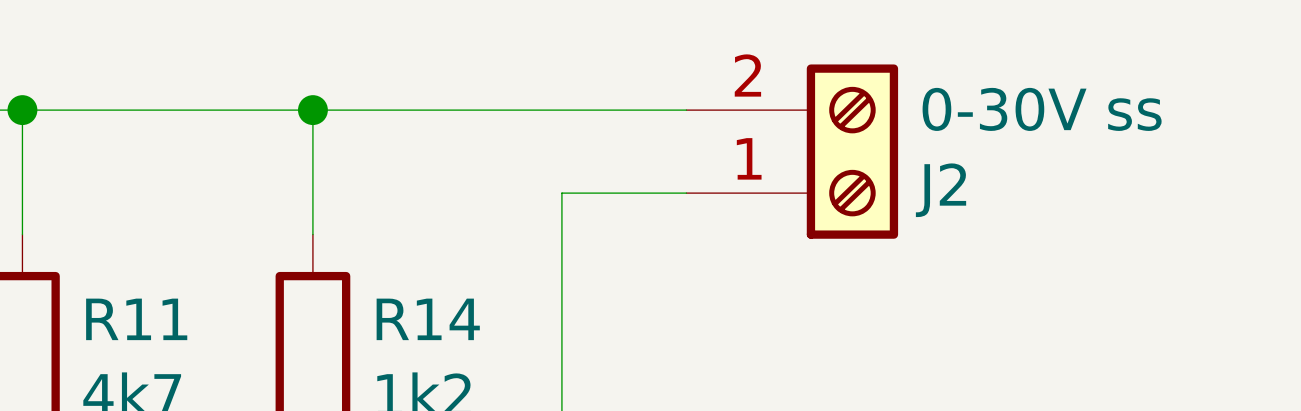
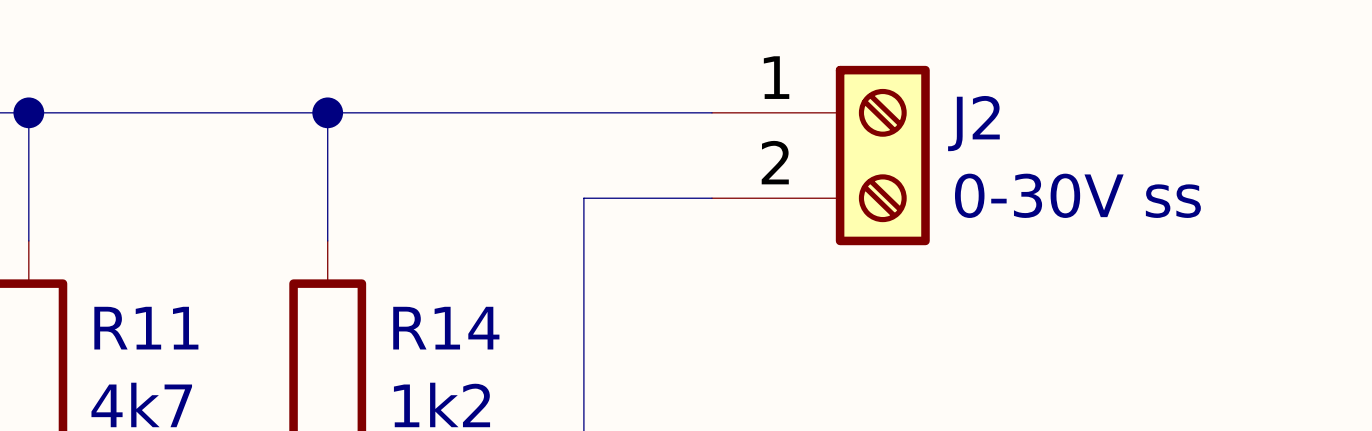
J2 flip: as is (852, 151) -> up-down (882, 155)

